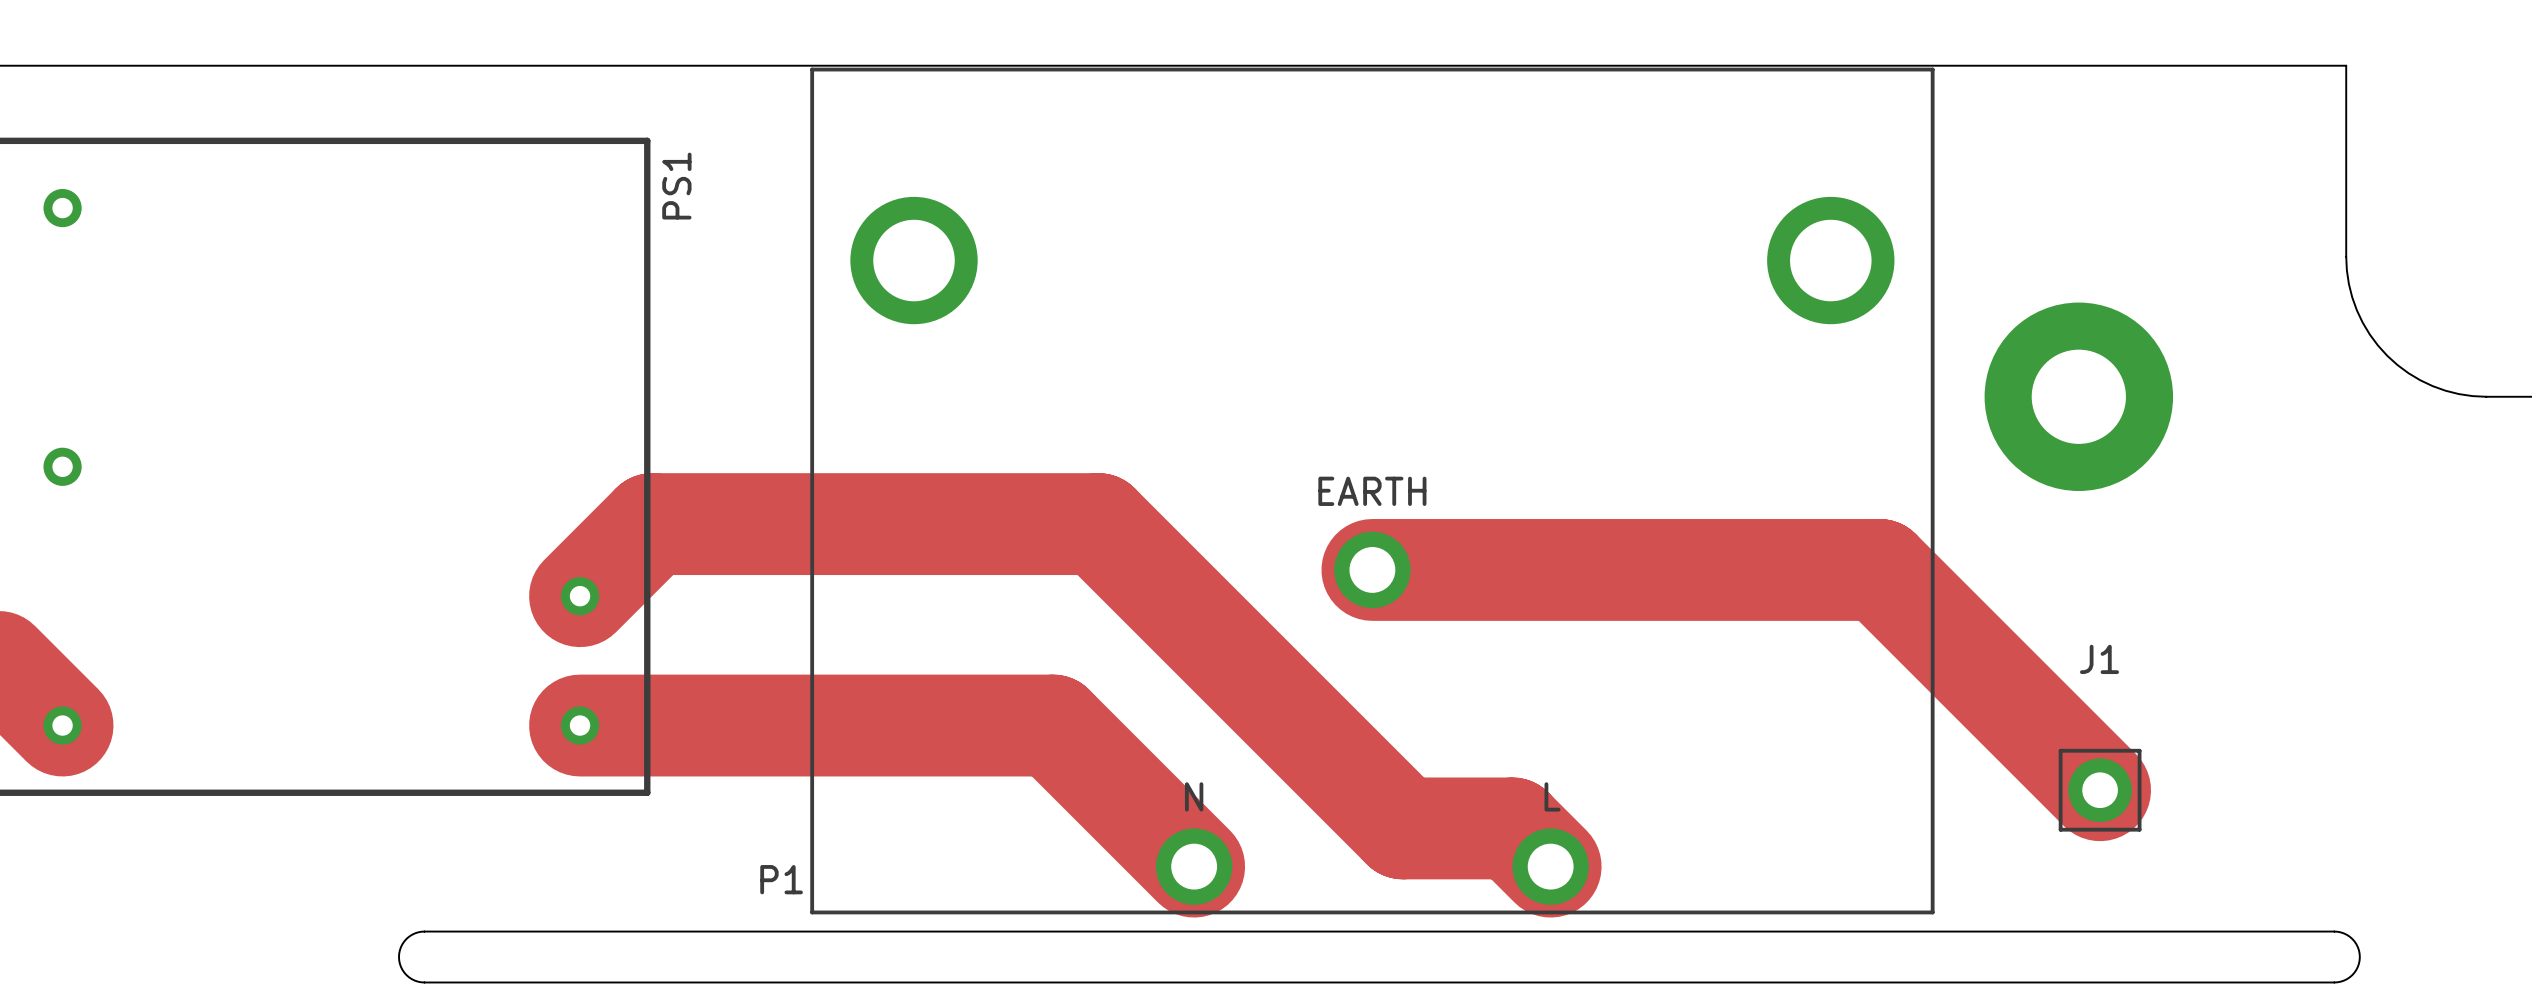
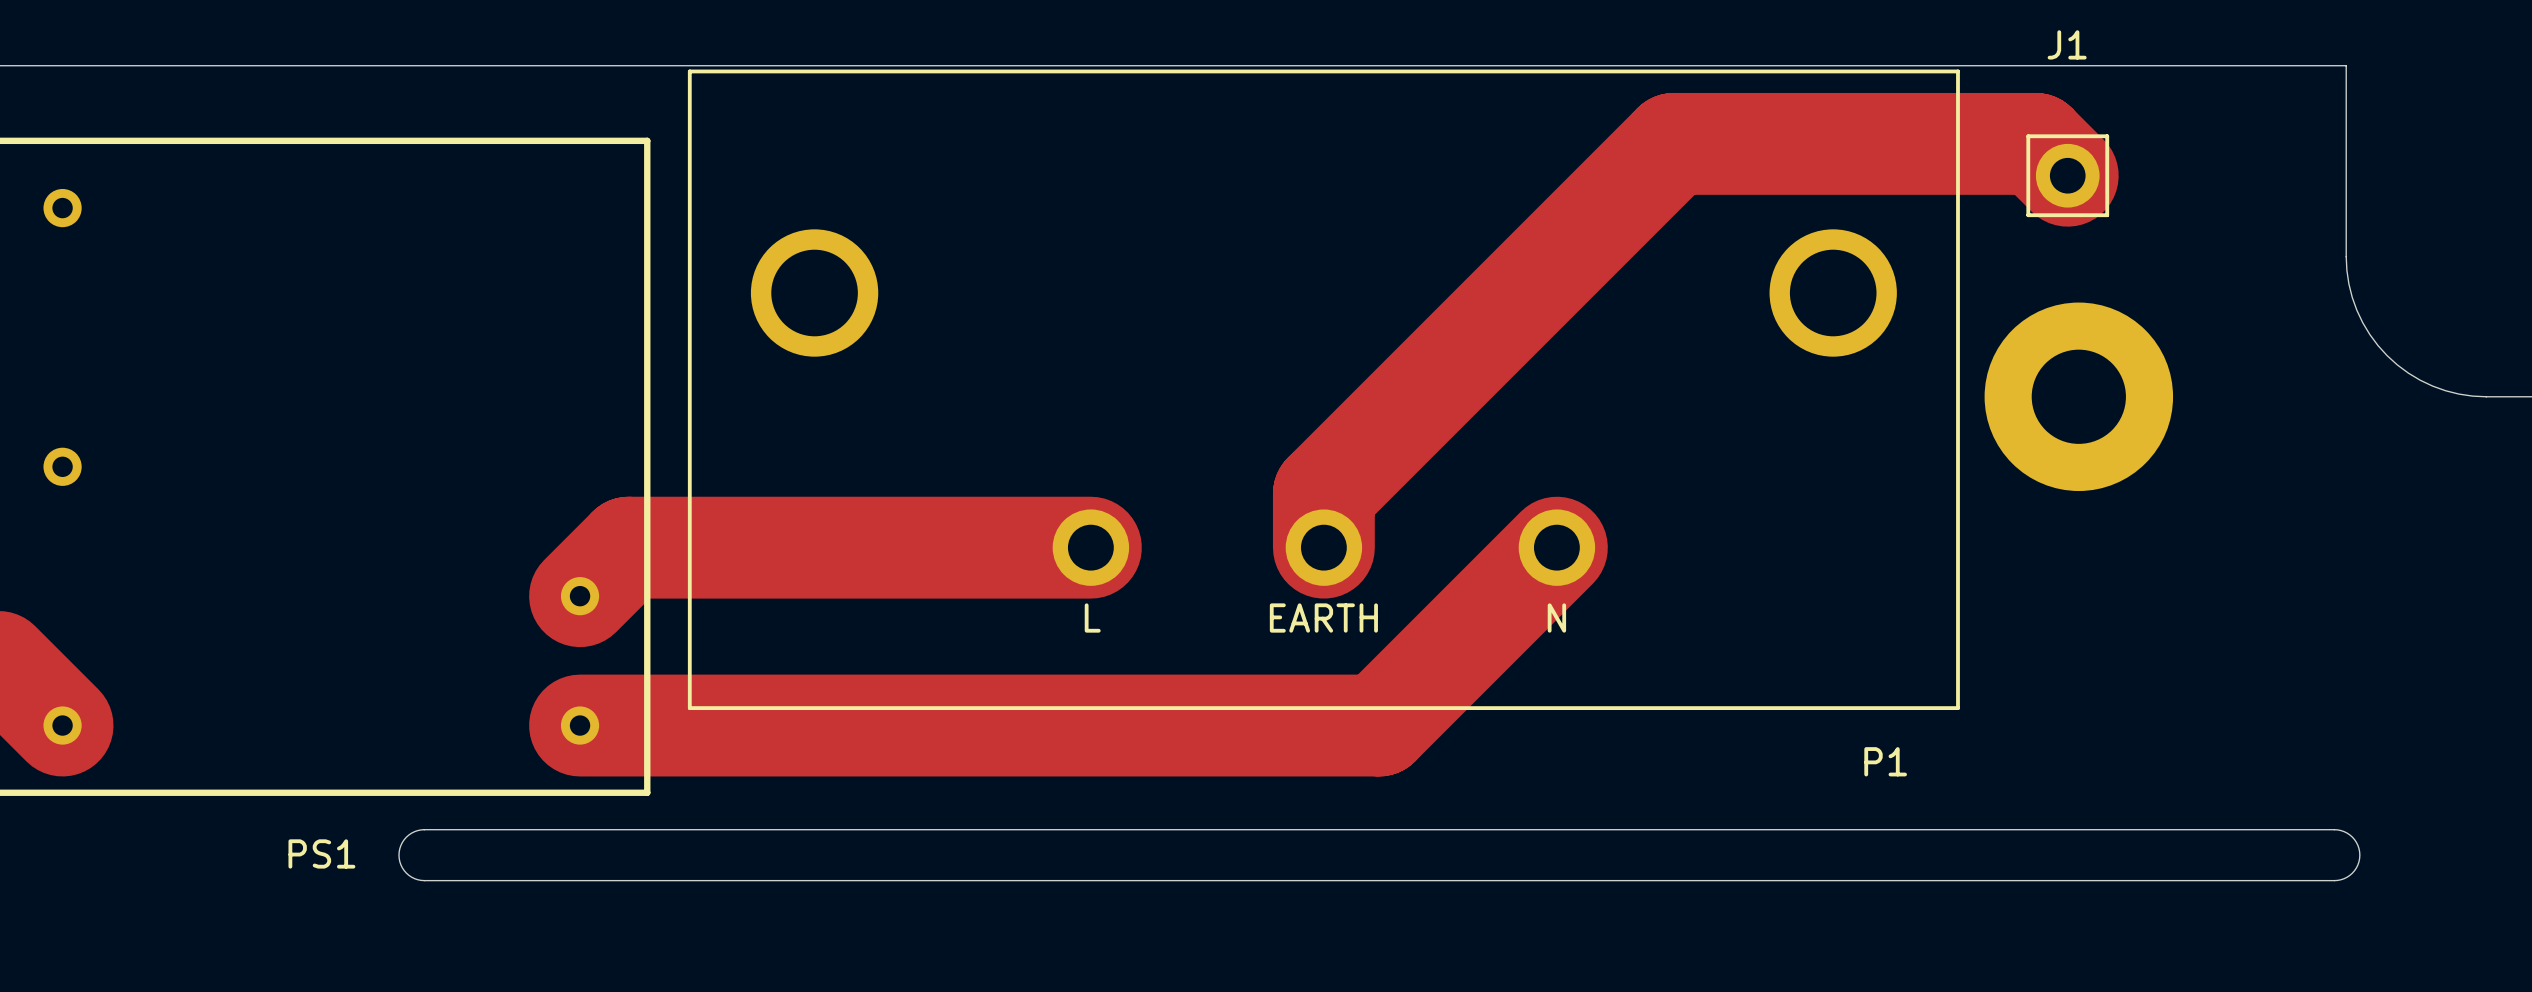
P1 footprint: [810, 67, 1935, 915] -> [687, 69, 1960, 711]
track: none -> (2067, 175) (2035, 143) (1673, 143) (1323, 493) (1323, 547)
PS1 name rotation: 0° (676, 186) -> 90° clockwise (321, 853)
PS1 name position: PS1 (676, 186) -> PS1 (321, 853)
track: (628, 547) (652, 524) (1098, 524) (1402, 828) (1512, 828) (1550, 866) -> (628, 547) (1090, 547)
track: (1372, 569) (1879, 569) (2100, 790) -> none
track: (1053, 725) (1194, 866) -> (1053, 725) (1379, 725) (1556, 547)
J1 position: (2100, 790) -> (2067, 175)
P1 name position: P1 (781, 879) -> P1 (1885, 761)
board edge: (424, 931) (2334, 931) (2344, 933) (2352, 939) (2357, 947) (2359, 957) (2357, 966) (2352, 975) (2344, 980) (2334, 982) (424, 982) (414, 980) (406, 975) (400, 966) (398, 957) (400, 947) (406, 939) (414, 933) (424, 931) -> (424, 829) (2334, 829) (2344, 831) (2352, 837) (2357, 845) (2359, 855) (2357, 864) (2352, 873) (2344, 878) (2334, 880) (424, 880) (414, 878) (406, 873) (400, 864) (398, 855) (400, 845) (406, 837) (414, 831) (424, 829)

